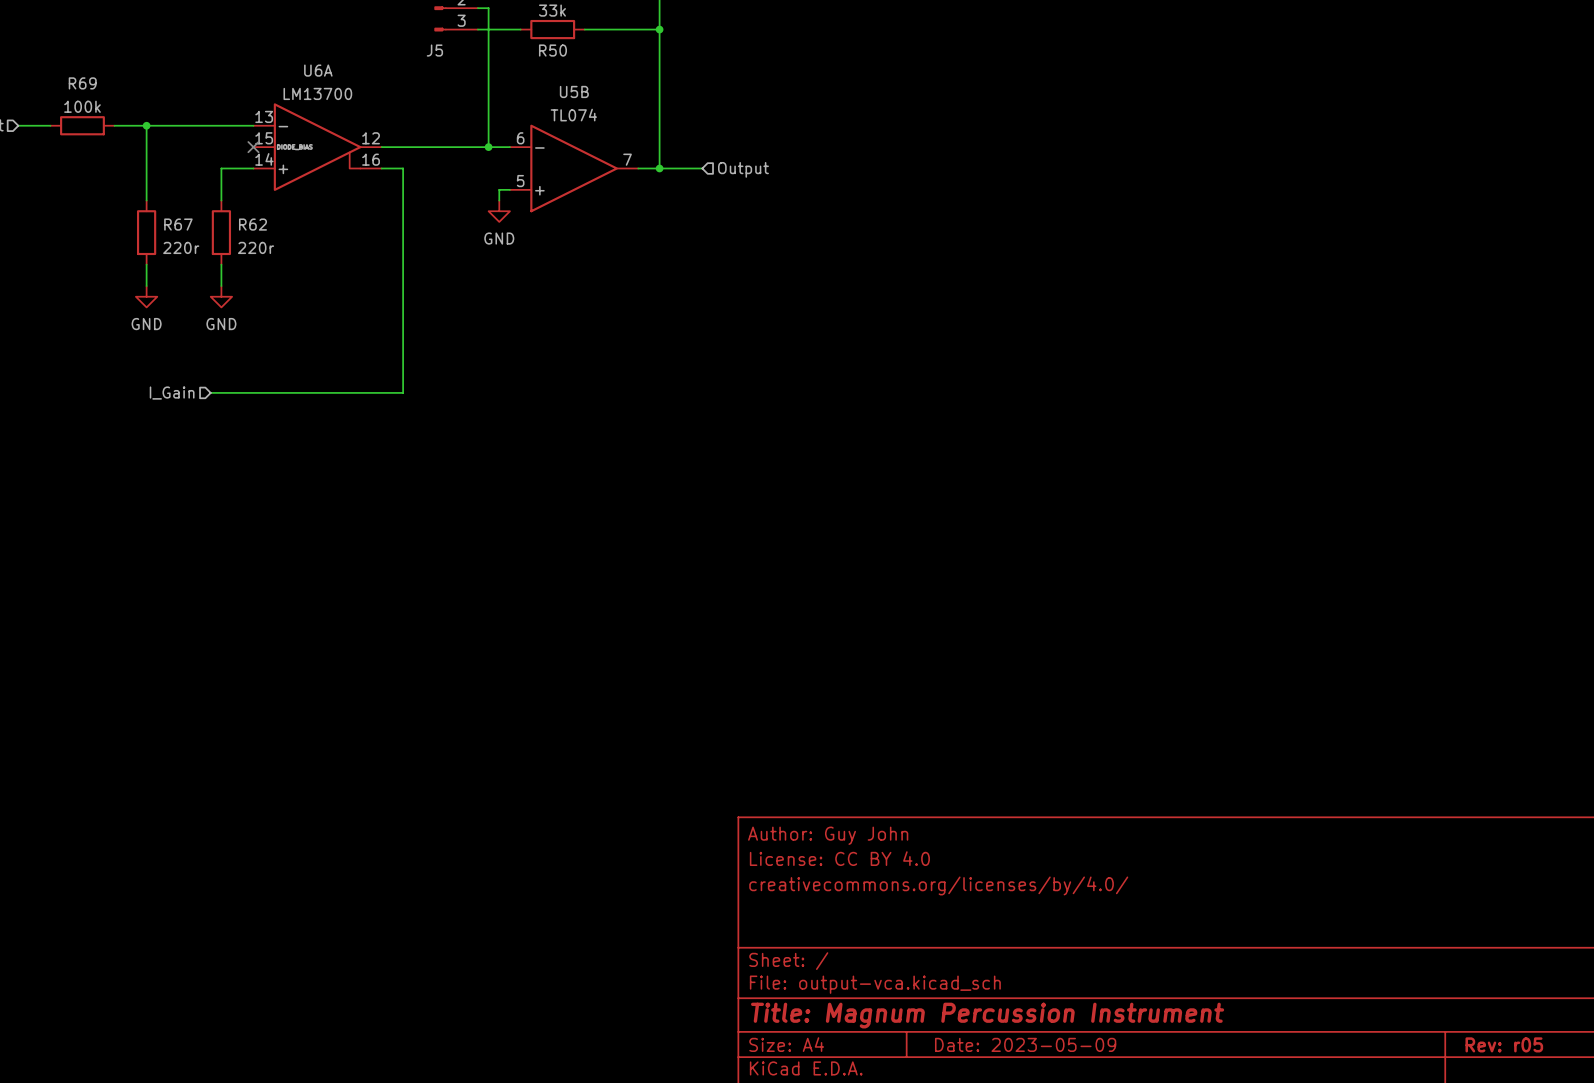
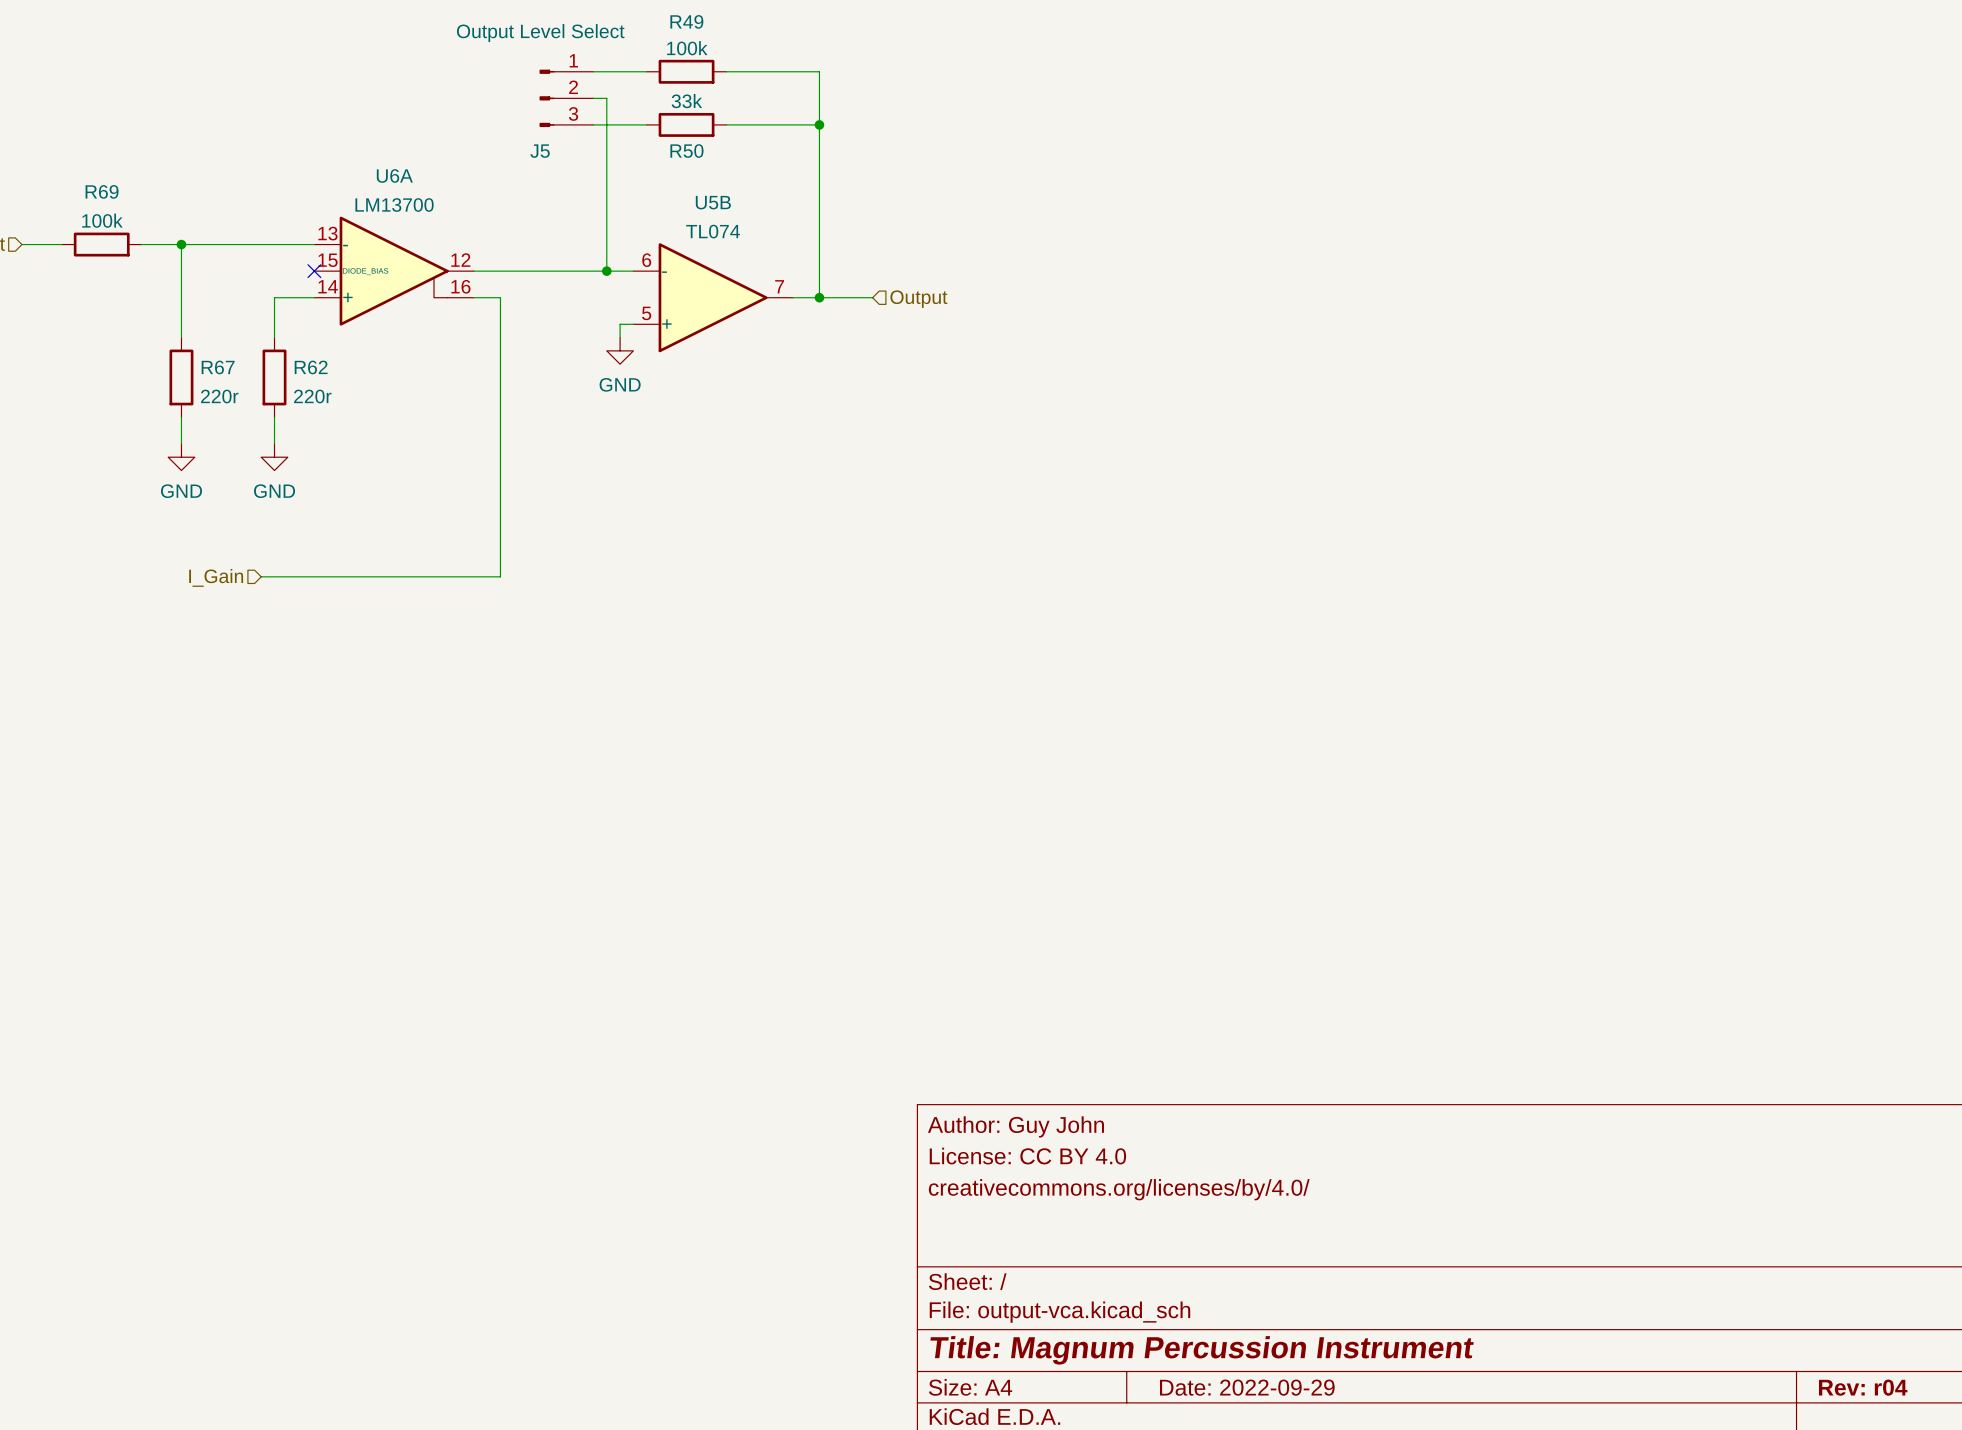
title block: Date: 2023-05-09 (1025, 1044) -> Date: 2022-09-29 (1247, 1387)
title block: Rev: r05 (1504, 1044) -> Rev: r04 (1863, 1387)

